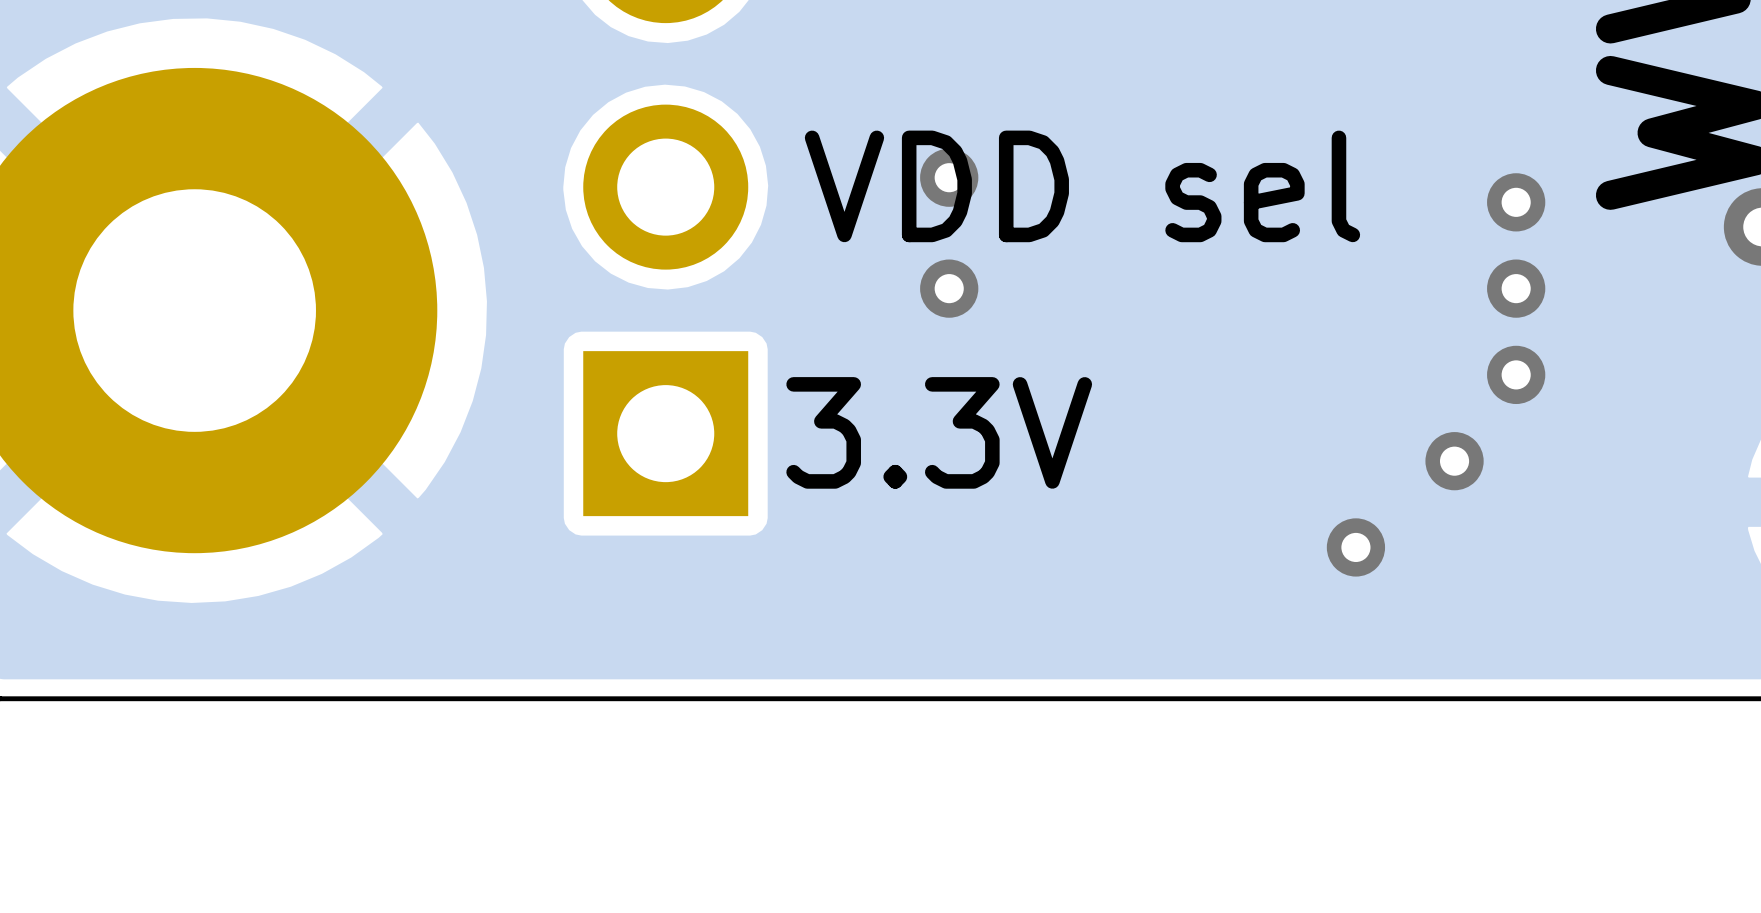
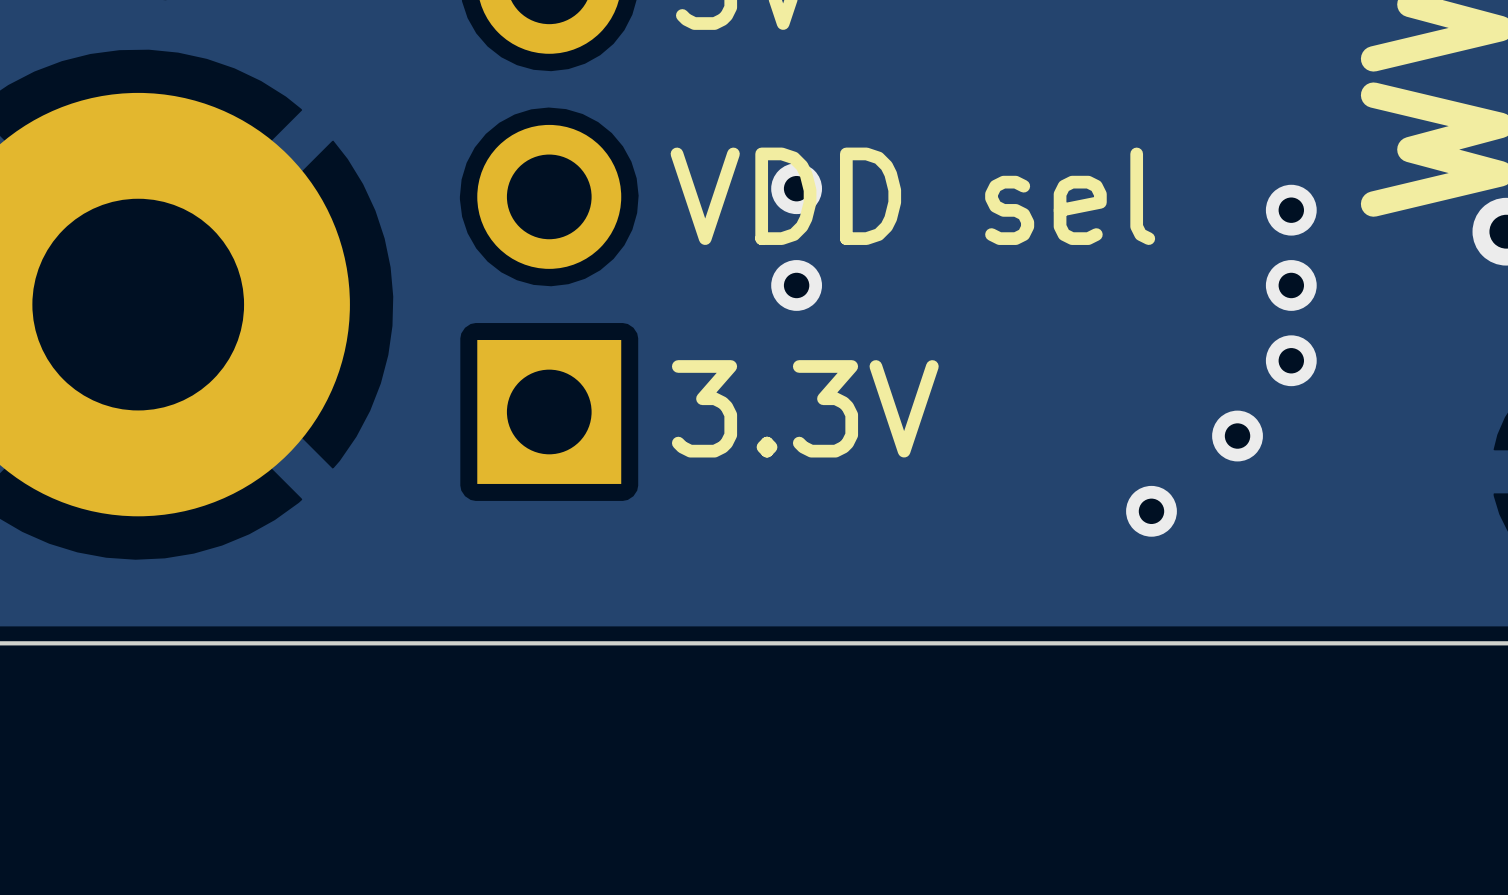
text position: 3.3V (939, 432) -> 3.3V (805, 408)

